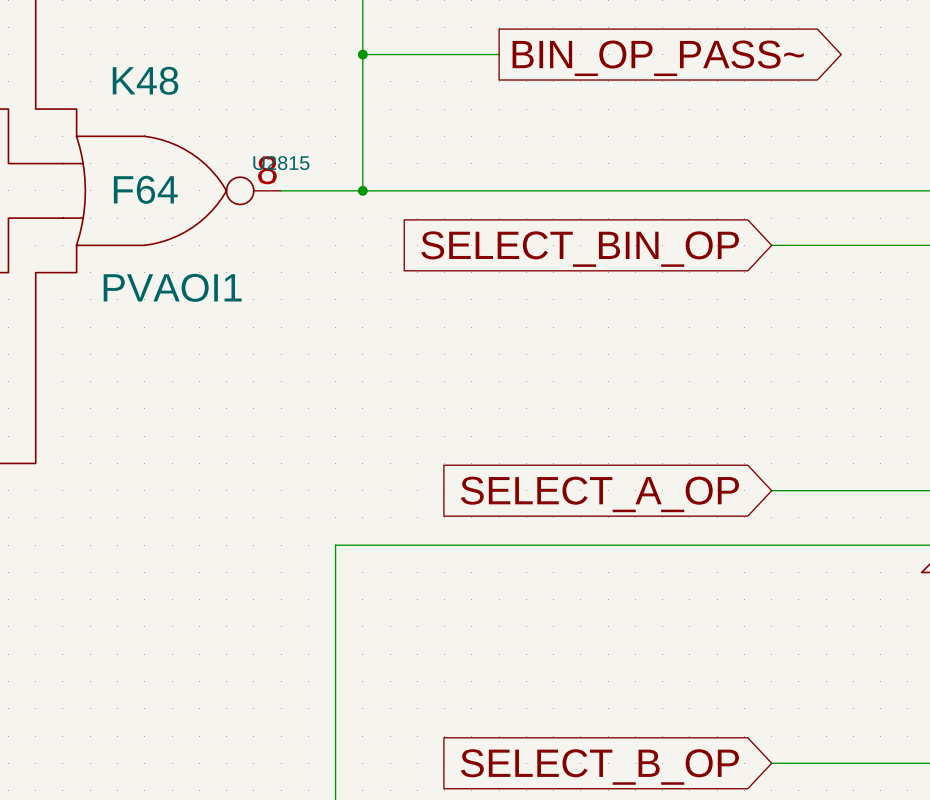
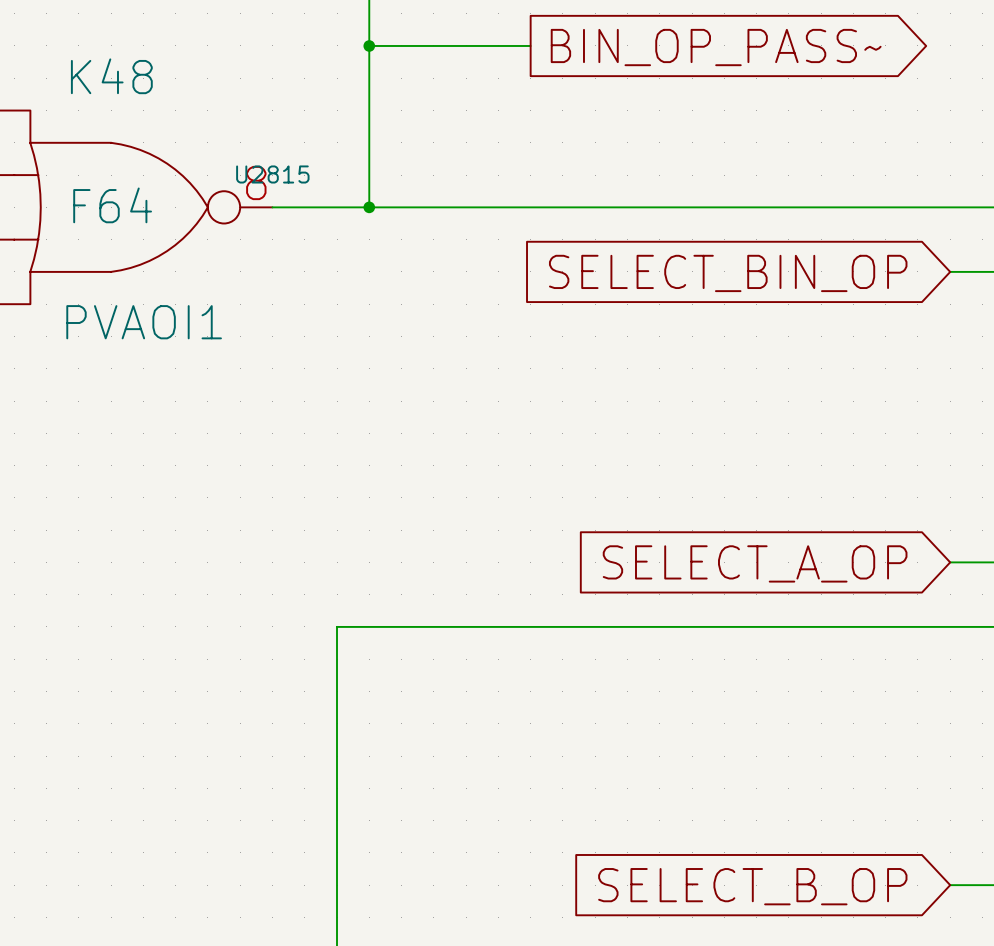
wire: (771, 245) (853, 245) -> none
global label position: SELECT_BIN_OP (580, 249) -> SELECT_BIN_OP (728, 273)
wire: (771, 490) (853, 490) -> none
global label position: SELECT_A_OP (599, 494) -> SELECT_A_OP (755, 563)
wire: (771, 763) (853, 763) -> none
global label position: SELECT_B_OP (599, 767) -> SELECT_B_OP (752, 886)

